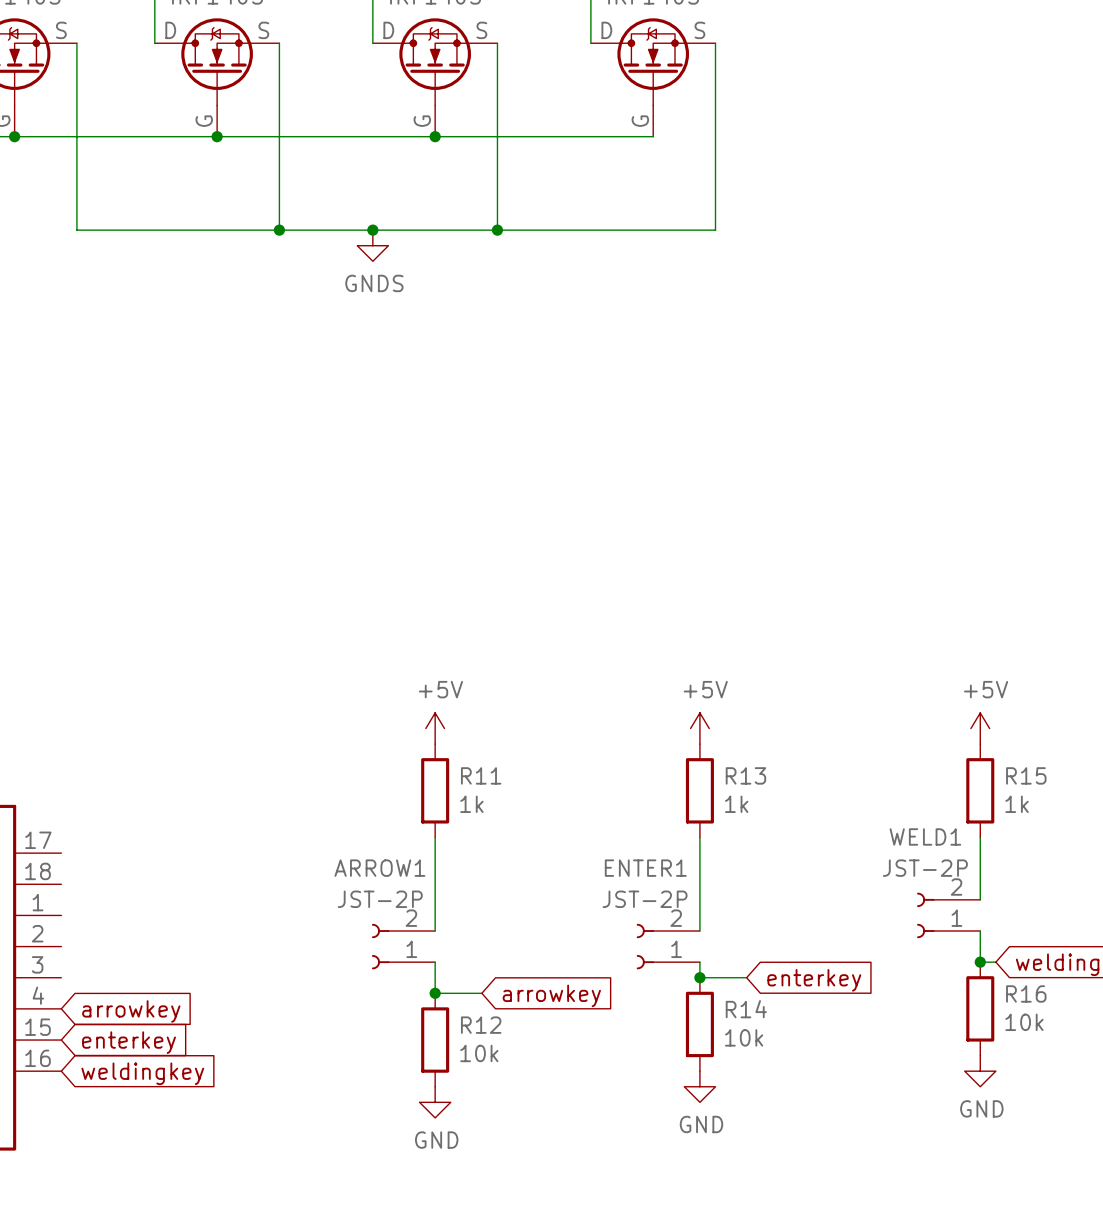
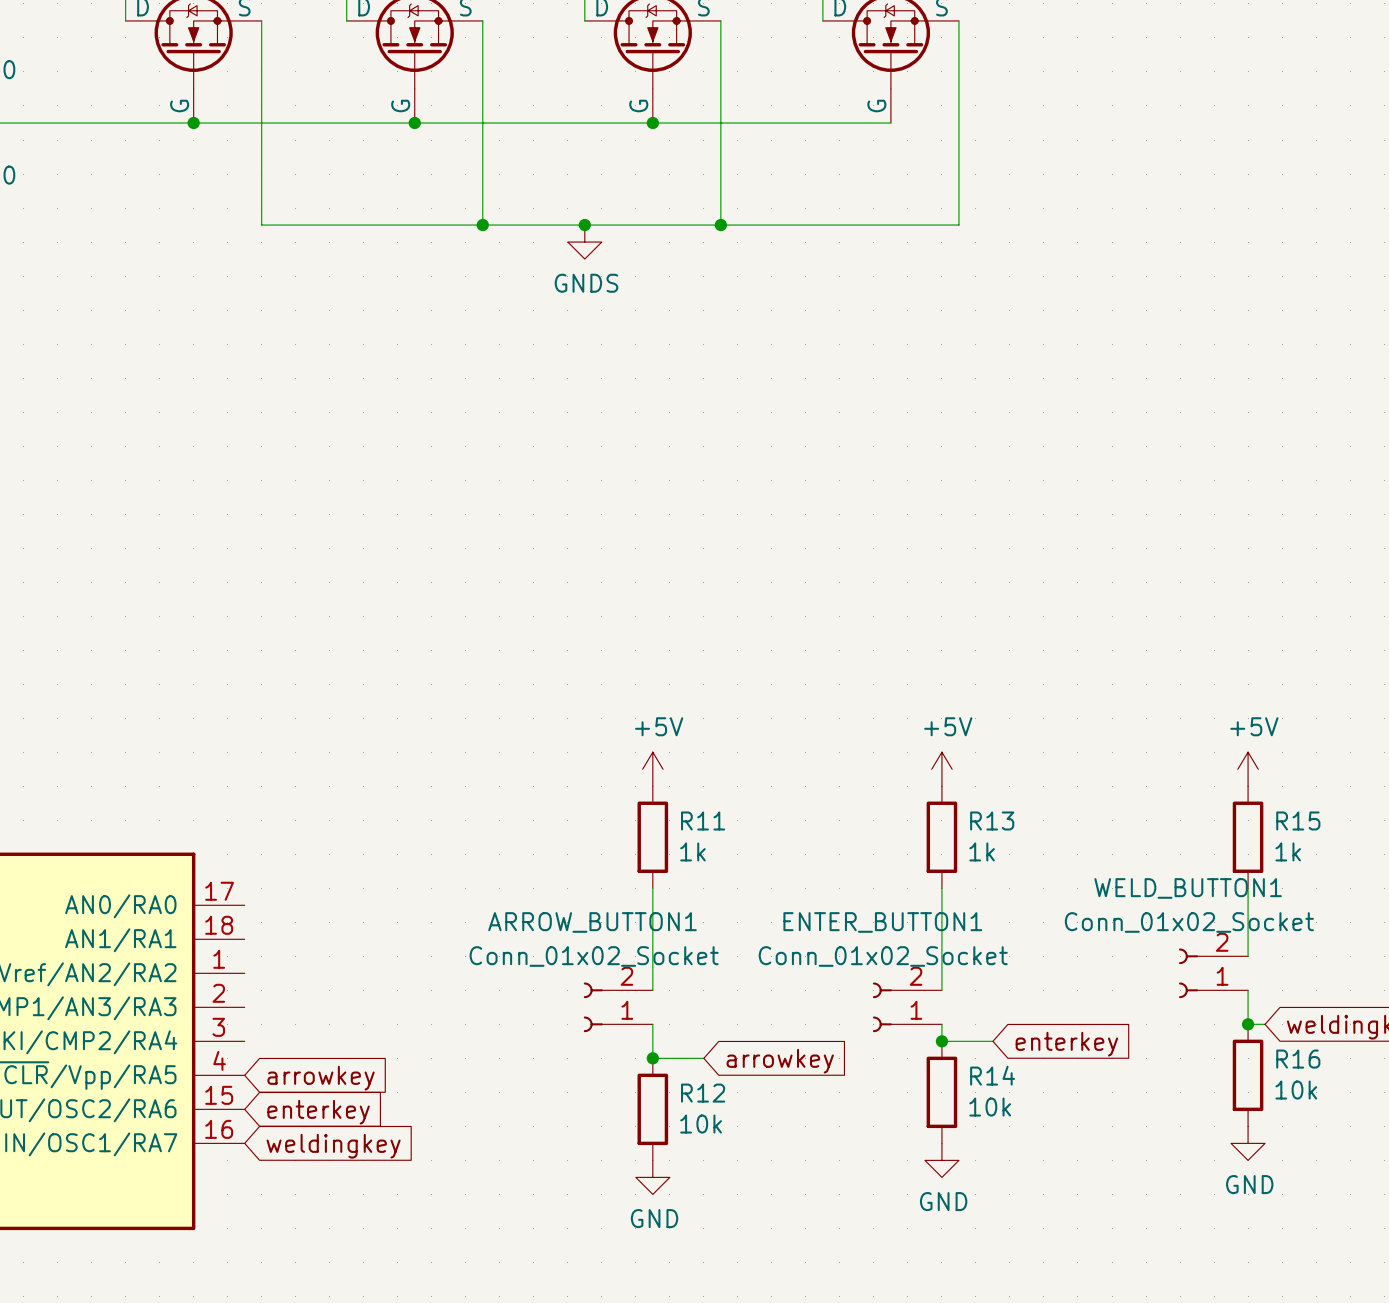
WELD1 name: WELD1 (925, 836) -> WELD_BUTTON1 (1188, 888)
ARROW1 name: ARROW1 (379, 868) -> ARROW_BUTTON1 (592, 922)
ENTER1 name: ENTER1 (645, 868) -> ENTER_BUTTON1 (882, 922)
WELD1 value: JST-2P (925, 868) -> Conn_01x02_Socket (1189, 922)
ARROW1 value: JST-2P (380, 899) -> Conn_01x02_Socket (594, 956)
ENTER1 value: JST-2P (645, 899) -> Conn_01x02_Socket (883, 956)

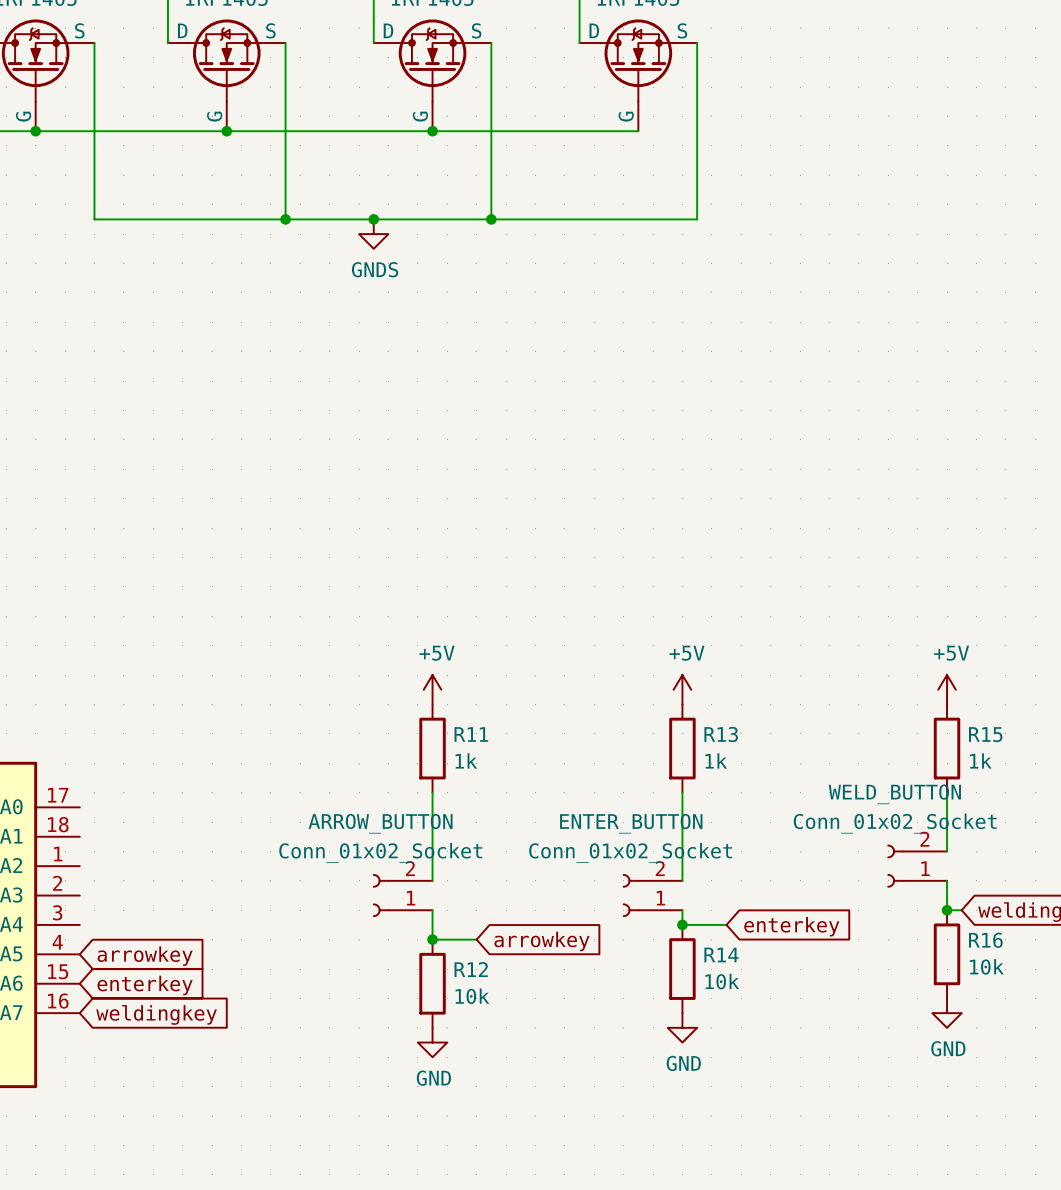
WELD_BUTTON1 name: WELD_BUTTON1 (1188, 888) -> WELD_BUTTON (894, 794)
ARROW_BUTTON1 name: ARROW_BUTTON1 (592, 922) -> ARROW_BUTTON (380, 823)
ENTER_BUTTON1 name: ENTER_BUTTON1 (882, 922) -> ENTER_BUTTON (631, 823)

